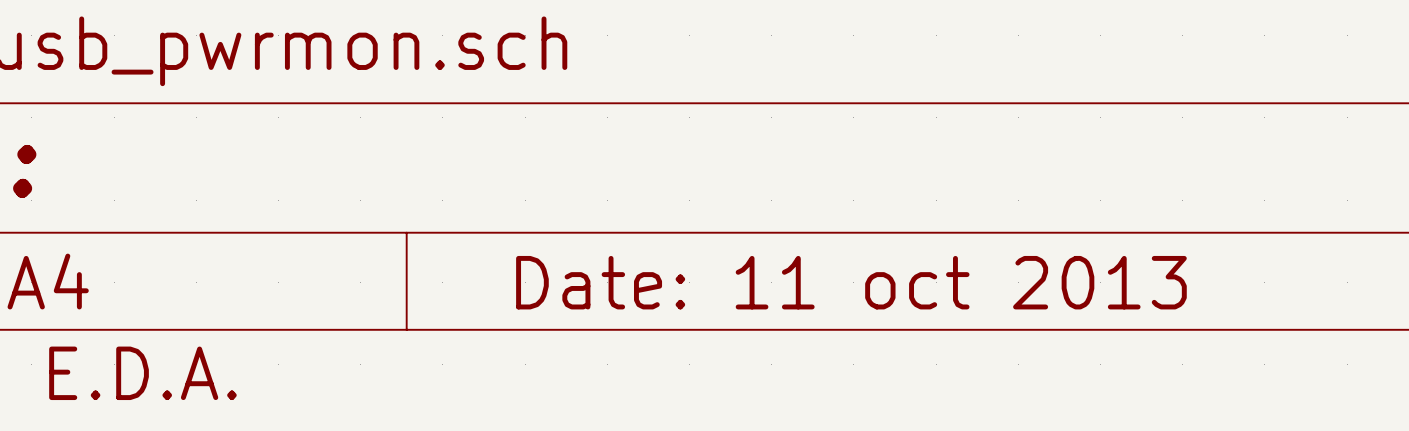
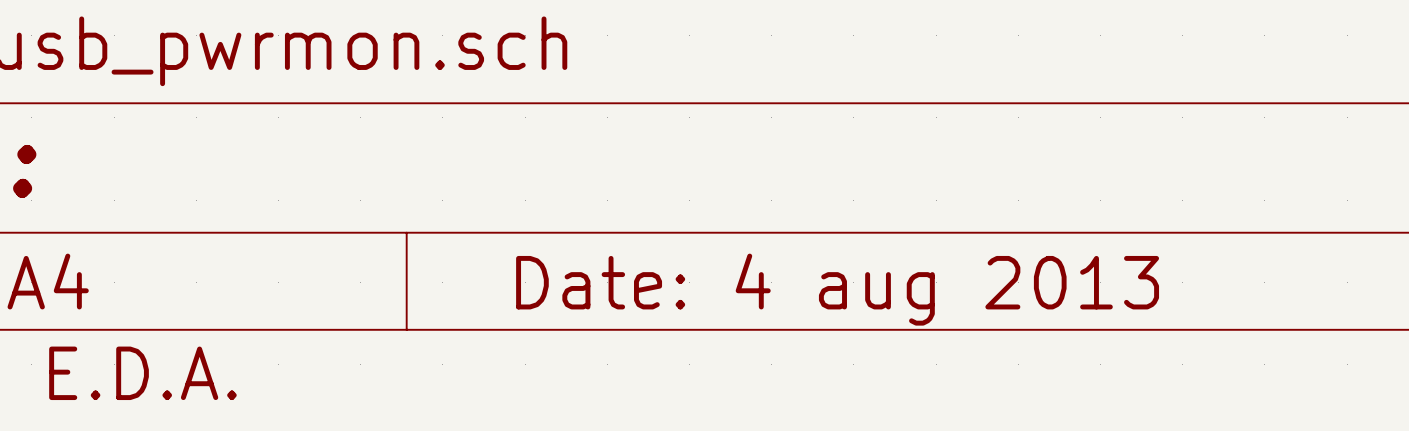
title block: Date: 11 oct 2013 (851, 282) -> Date: 4 aug 2013 (837, 289)

